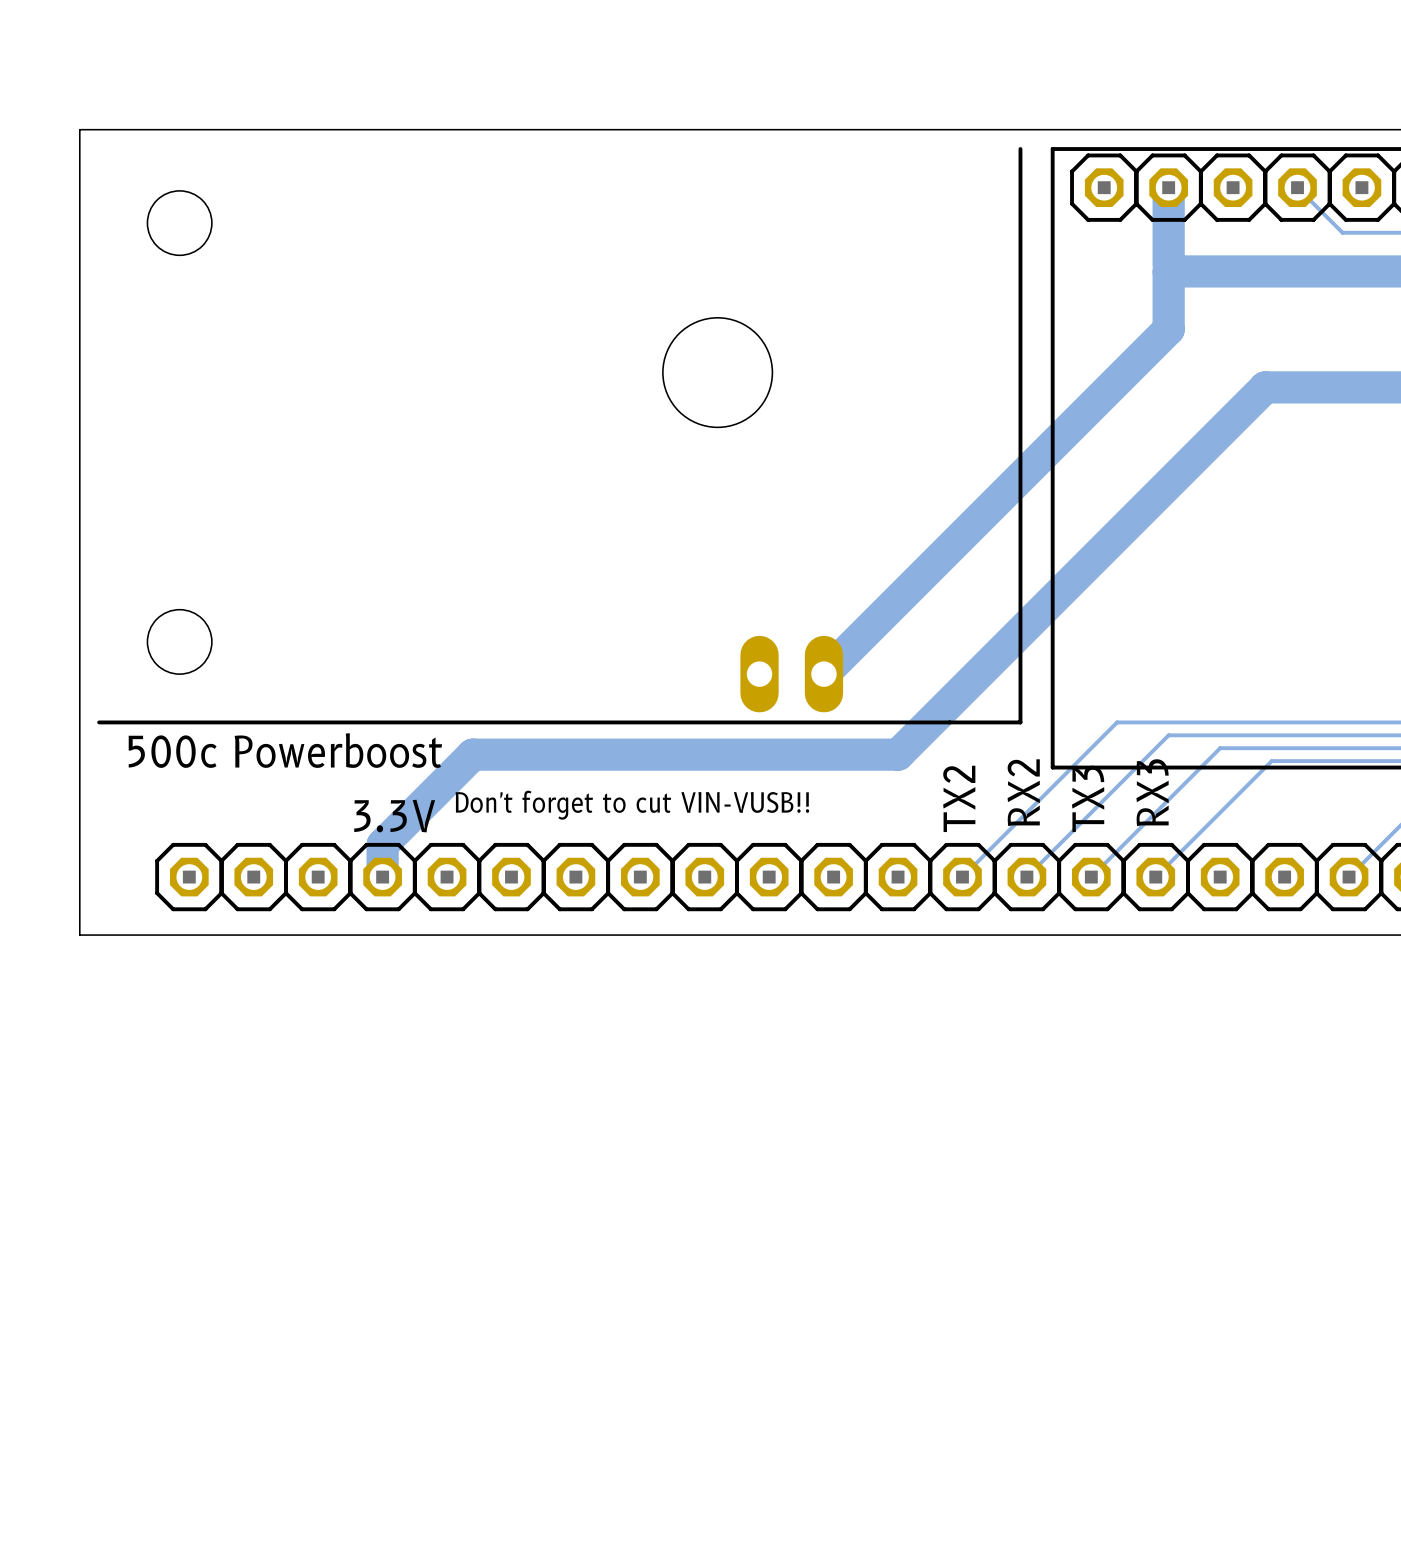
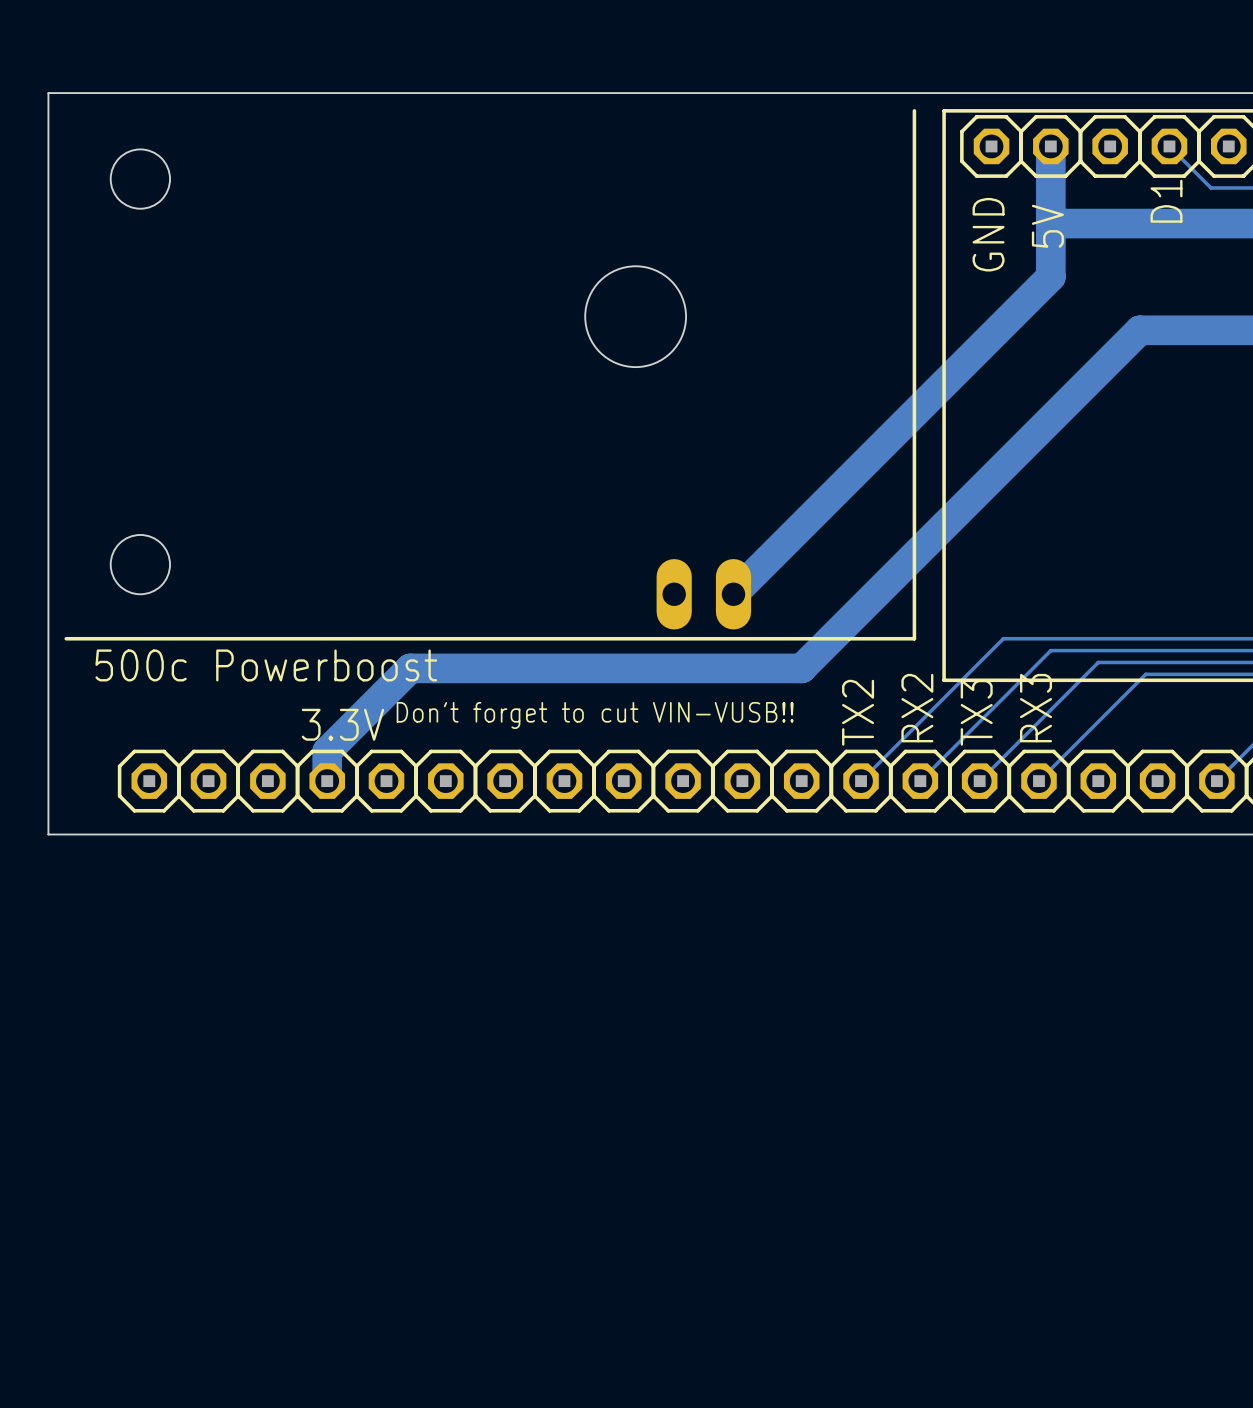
text: none -> D1 (1166, 201)
text: none -> 5V (1047, 226)
text: none -> GND (988, 234)

